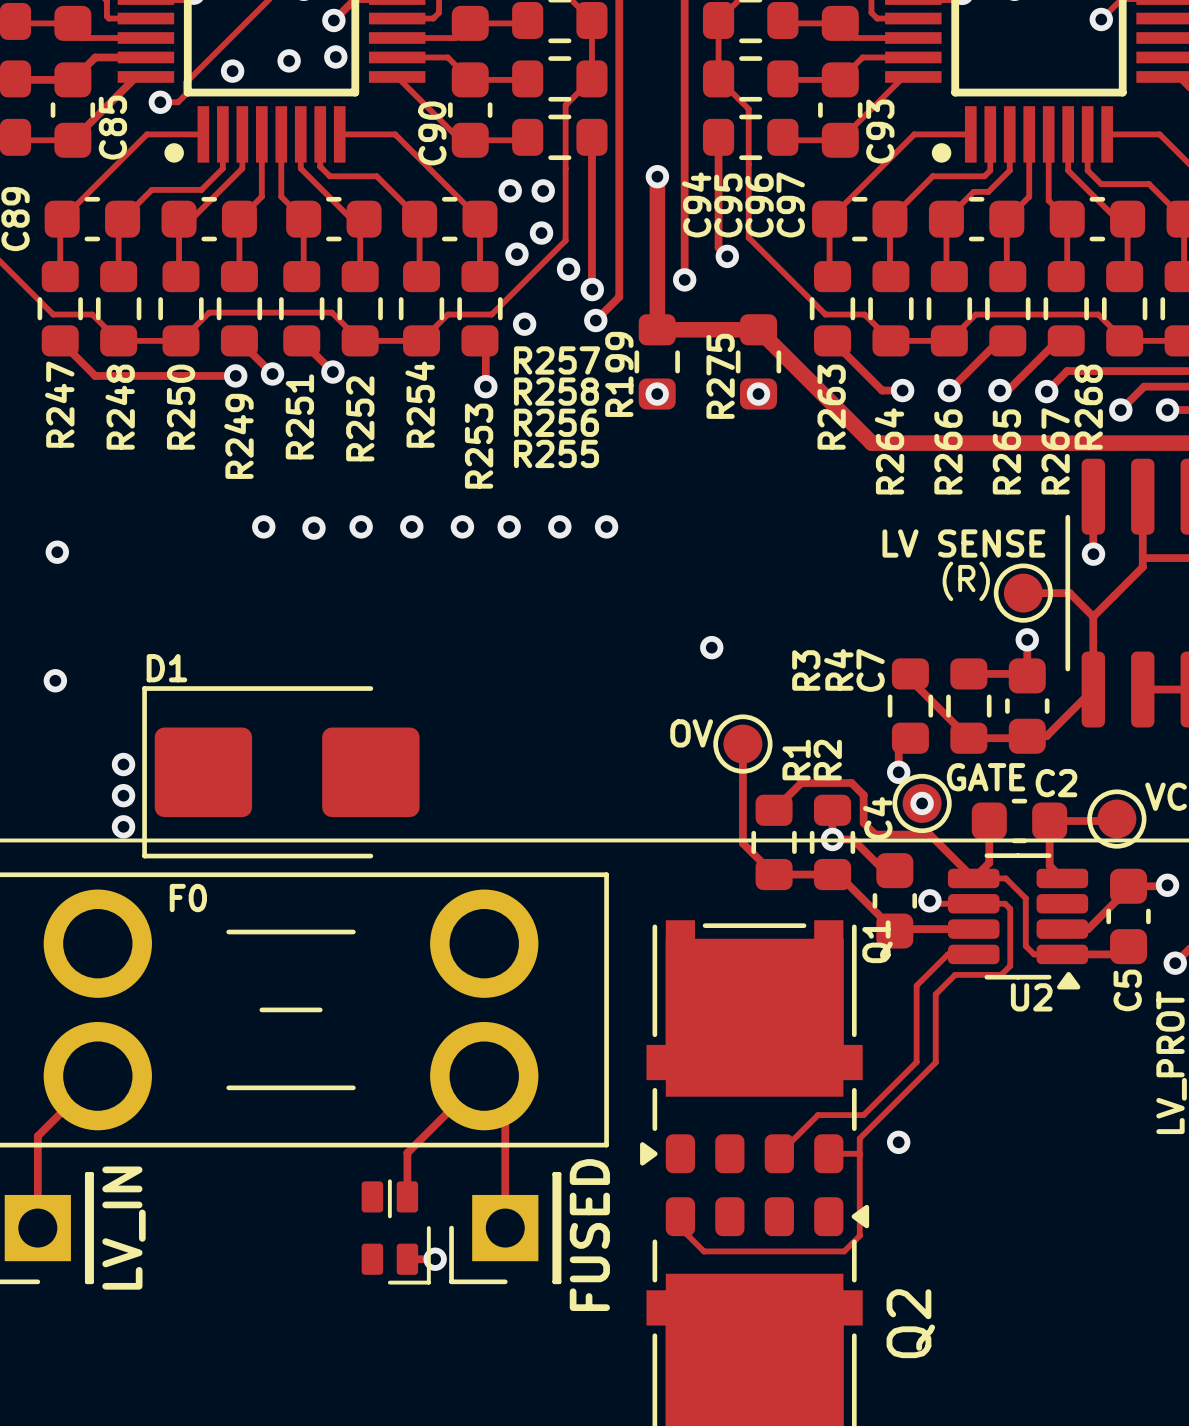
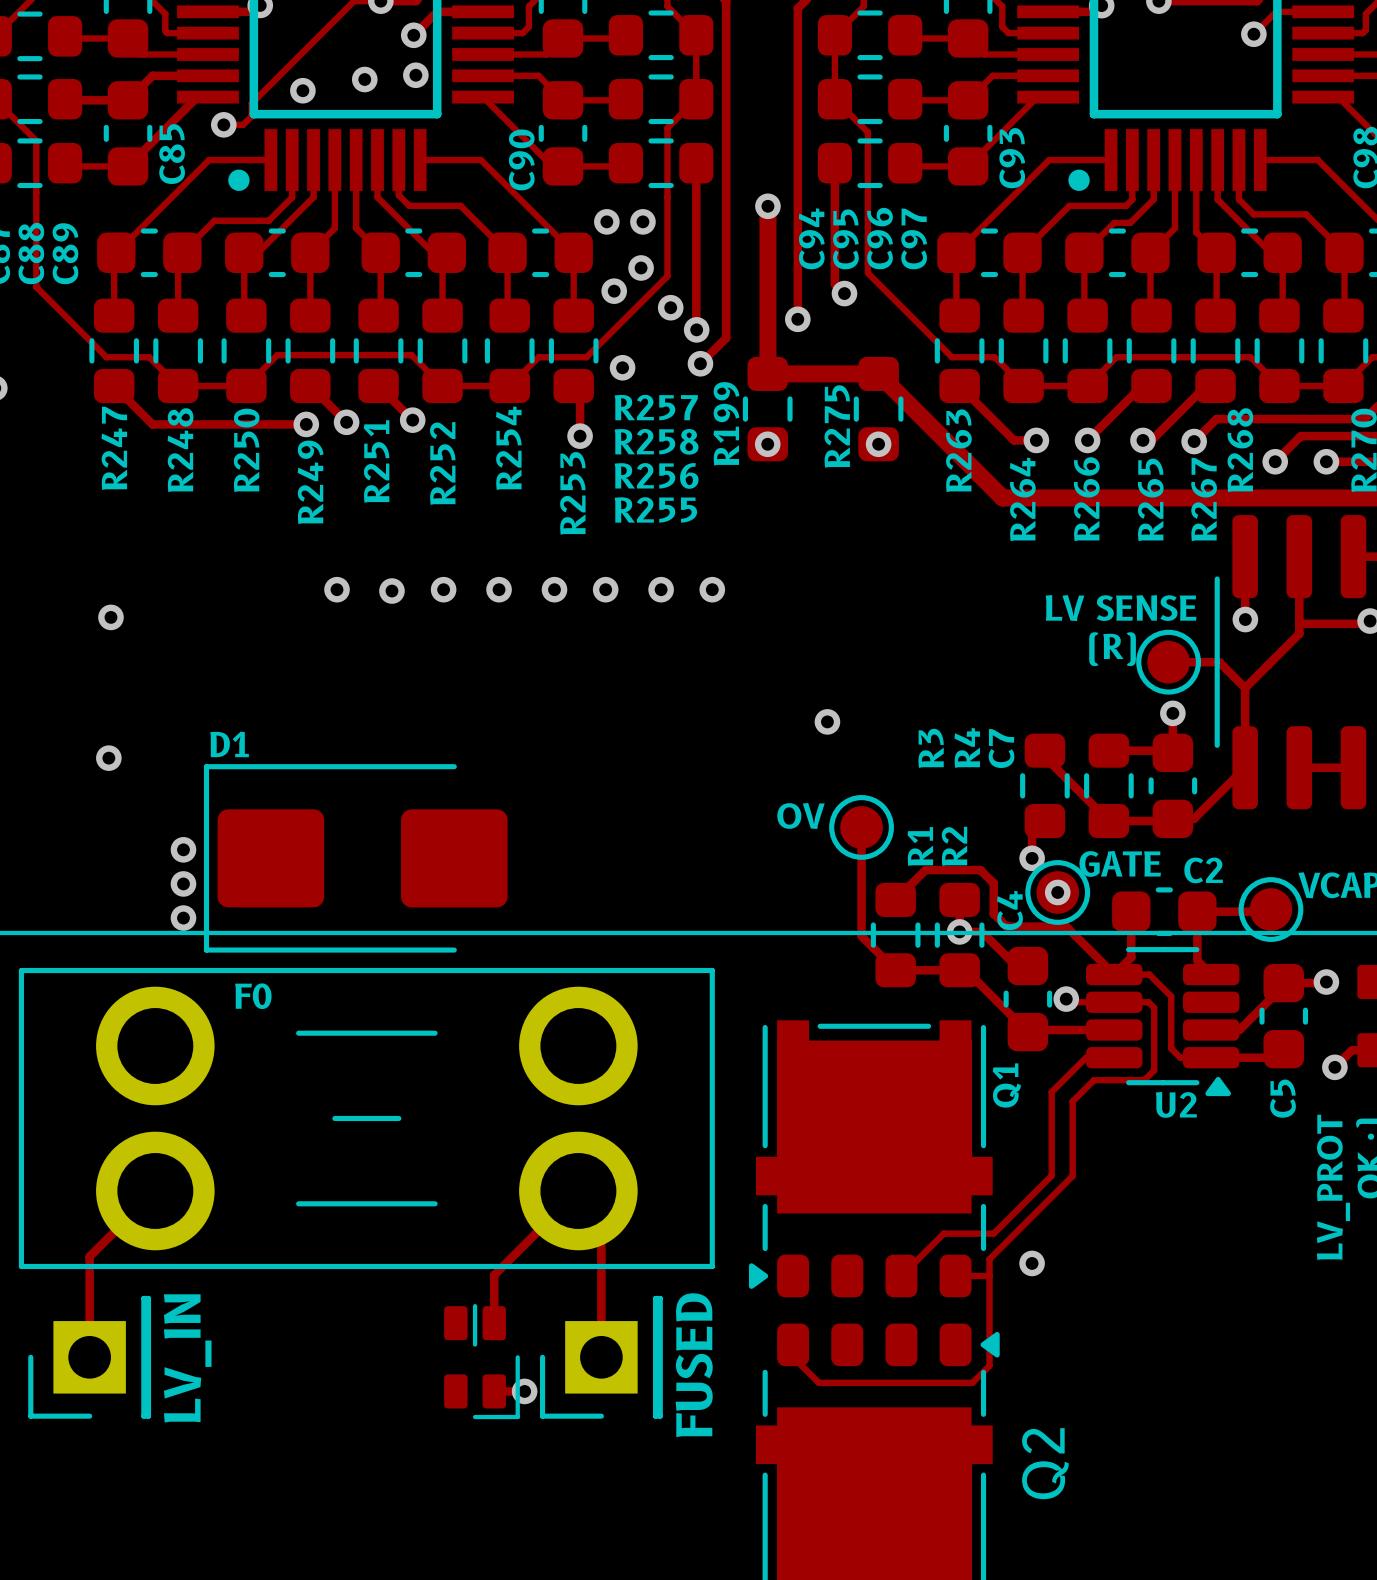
Q1 name position: Q1 (877, 941) -> Q1 (1006, 1085)

